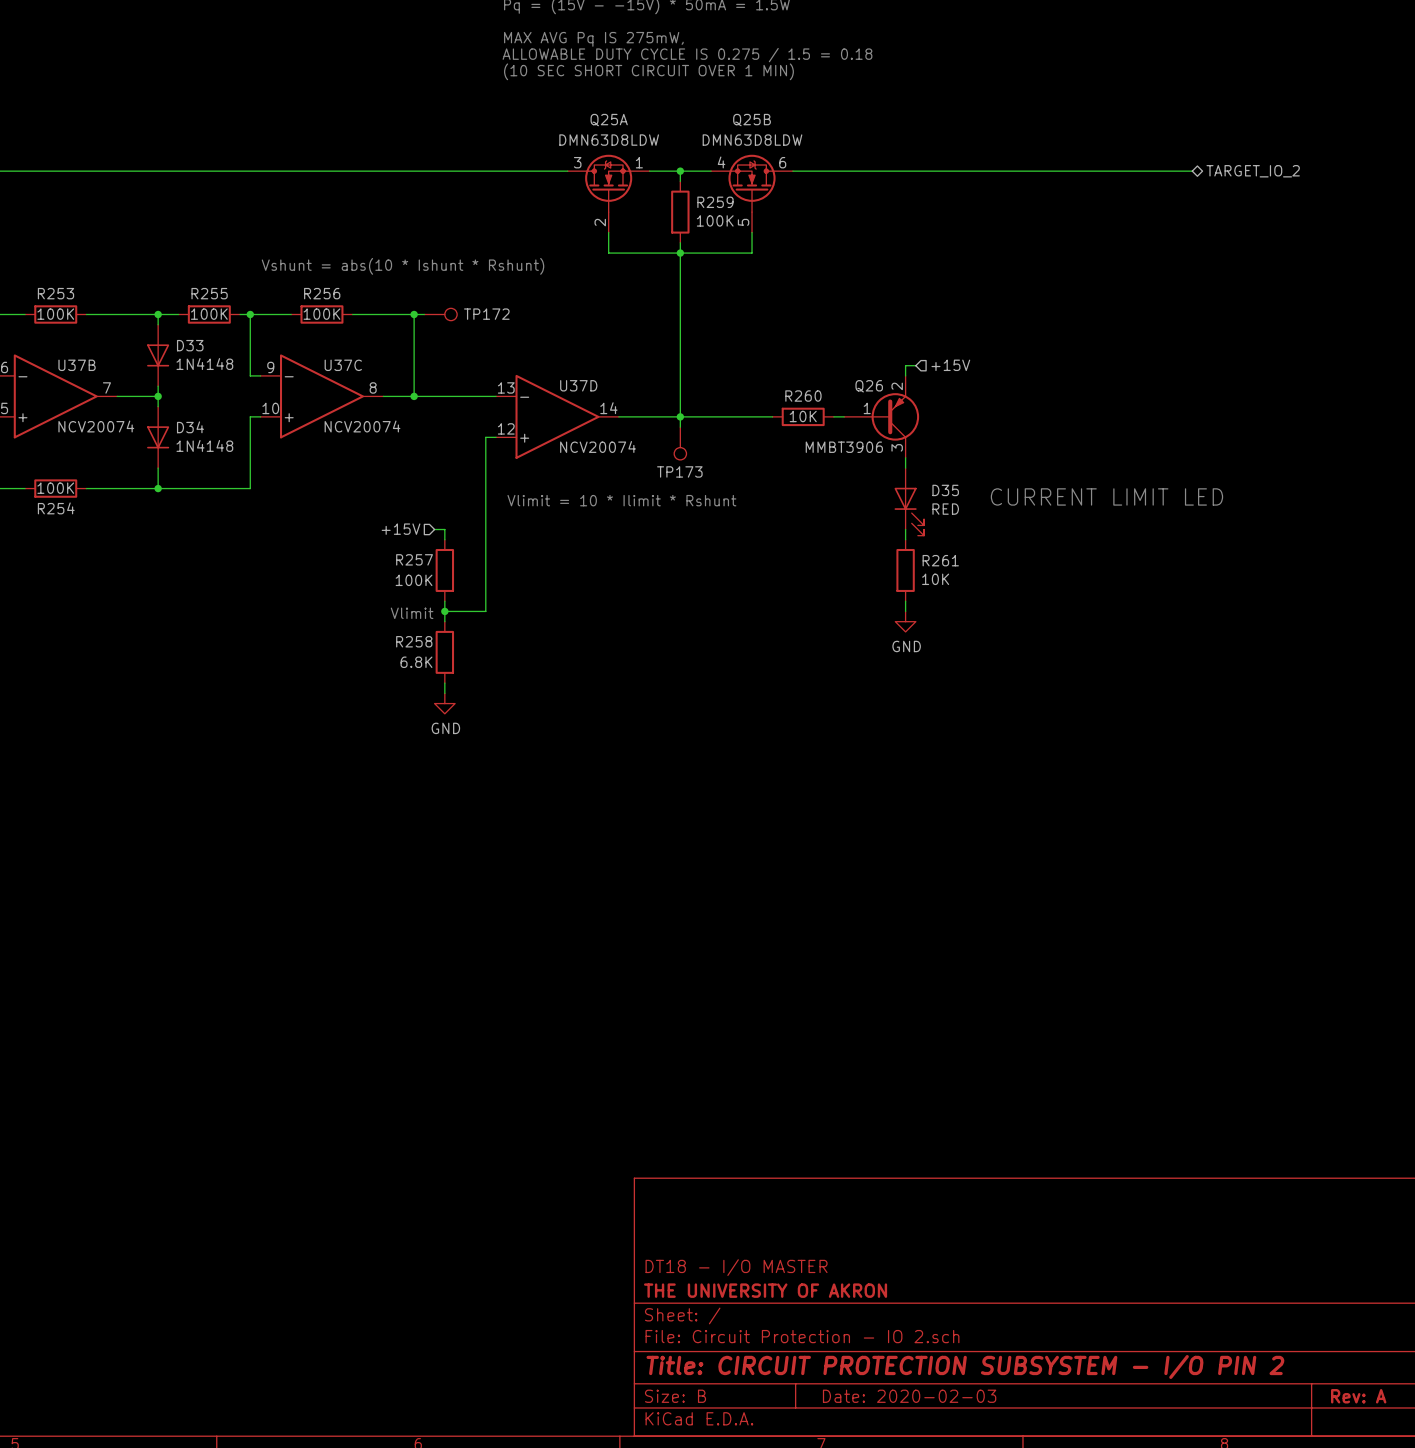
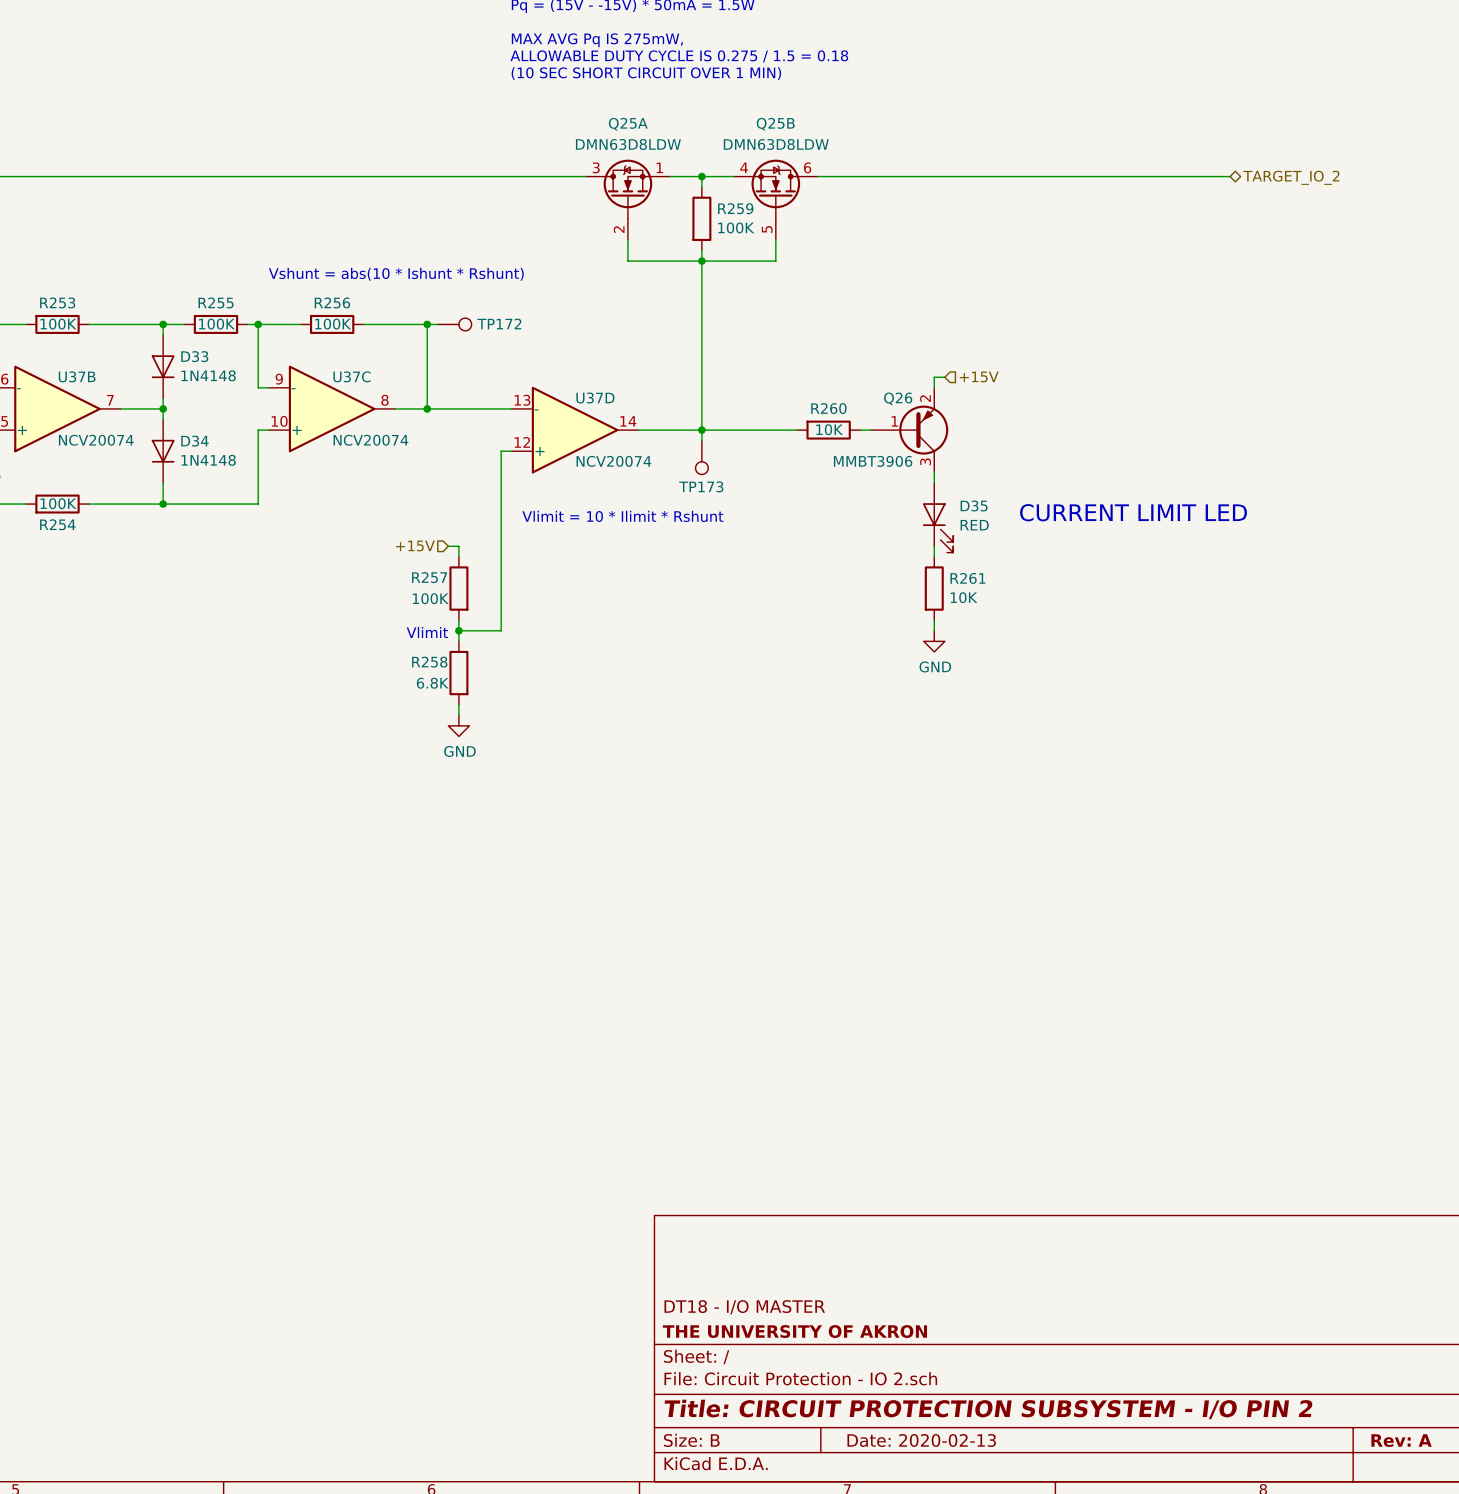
title block: Date: 2020-02-03 (909, 1396) -> Date: 2020-02-13 (921, 1440)

